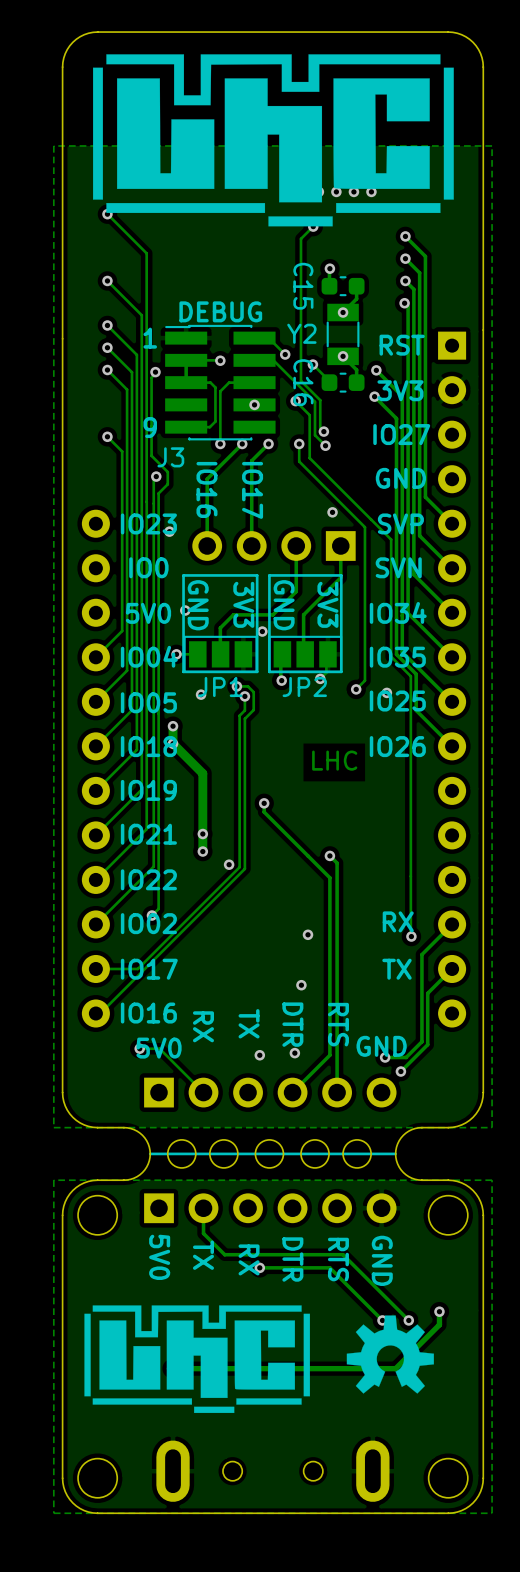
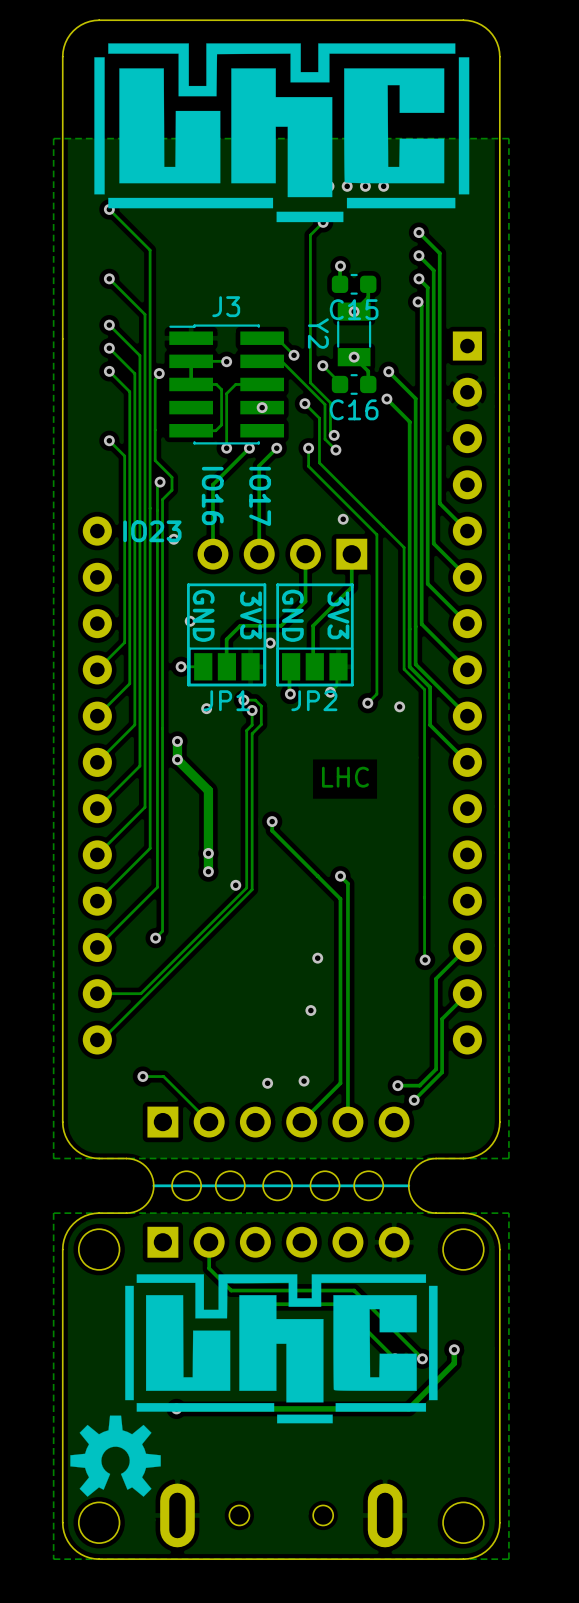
C15 name rotation: 0° (303, 286) -> 90° counterclockwise (354, 309)
text: DEBUG (220, 311) -> none
Y2 name rotation: 0° (301, 333) -> 90° clockwise (318, 333)
text: 1 (150, 338) -> none
text: RST (402, 345) -> none
C16 name rotation: 0° (303, 382) -> 90° counterclockwise (354, 409)
text: 3V3 (400, 390) -> none
text: 9 (150, 427) -> none
text: IO27 (401, 434) -> none
J3 name position: J3 (170, 457) -> J3 (226, 306)
text: GND (400, 478) -> none
text: SVP (400, 523) -> none
text: IO0 (148, 567) -> none
text: SVN (398, 567) -> none
text: IO34 (398, 612) -> none
text: 5V0 (148, 613) -> none
text: IO04 (149, 656) -> none
text: IO35 (397, 657) -> none
text: IO25 (397, 701) -> none
text: IO05 (148, 702) -> none
text: IO18 (148, 746) -> none
text: IO26 (397, 746) -> none
text: IO19 (148, 790) -> none
text: IO21 (148, 834) -> none
text: IO22 (148, 879) -> none
text: RX (398, 921) -> none
text: IO02 (148, 923) -> none
text: IO17 (149, 969) -> none
text: TX (396, 969) -> none
text: IO16 (148, 1013) -> none
text: TX (249, 1023) -> none
text: DTR (292, 1024) -> none
text: RTS (338, 1024) -> none
text: RX (203, 1026) -> none
text: GND (381, 1046) -> none
text: 5V0 (158, 1048) -> none
drawing: none -> [125, 1274, 438, 1424]
text: TX (203, 1255) -> none
text: 5V0 (159, 1257) -> none
text: RX (249, 1259) -> none
text: DTR (292, 1259) -> none
text: RTS (338, 1259) -> none
text: GND (382, 1260) -> none
drawing: [84, 1305, 310, 1414] -> none
drawing position: (390, 1354) -> (115, 1456)

